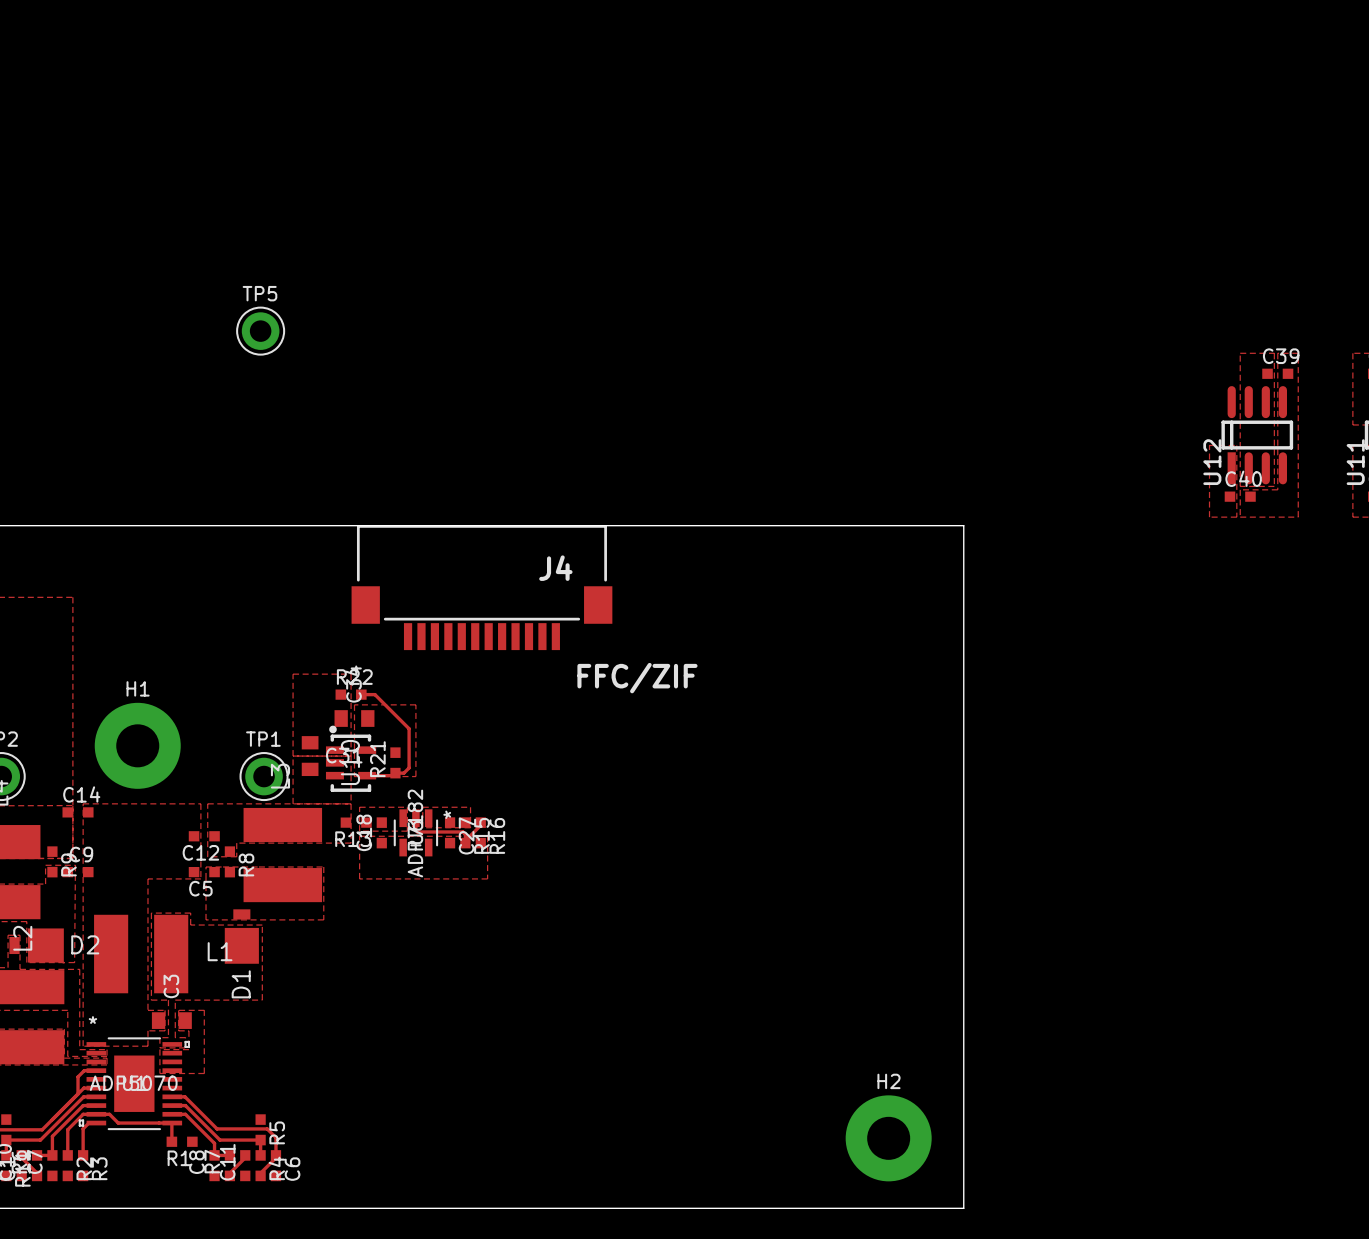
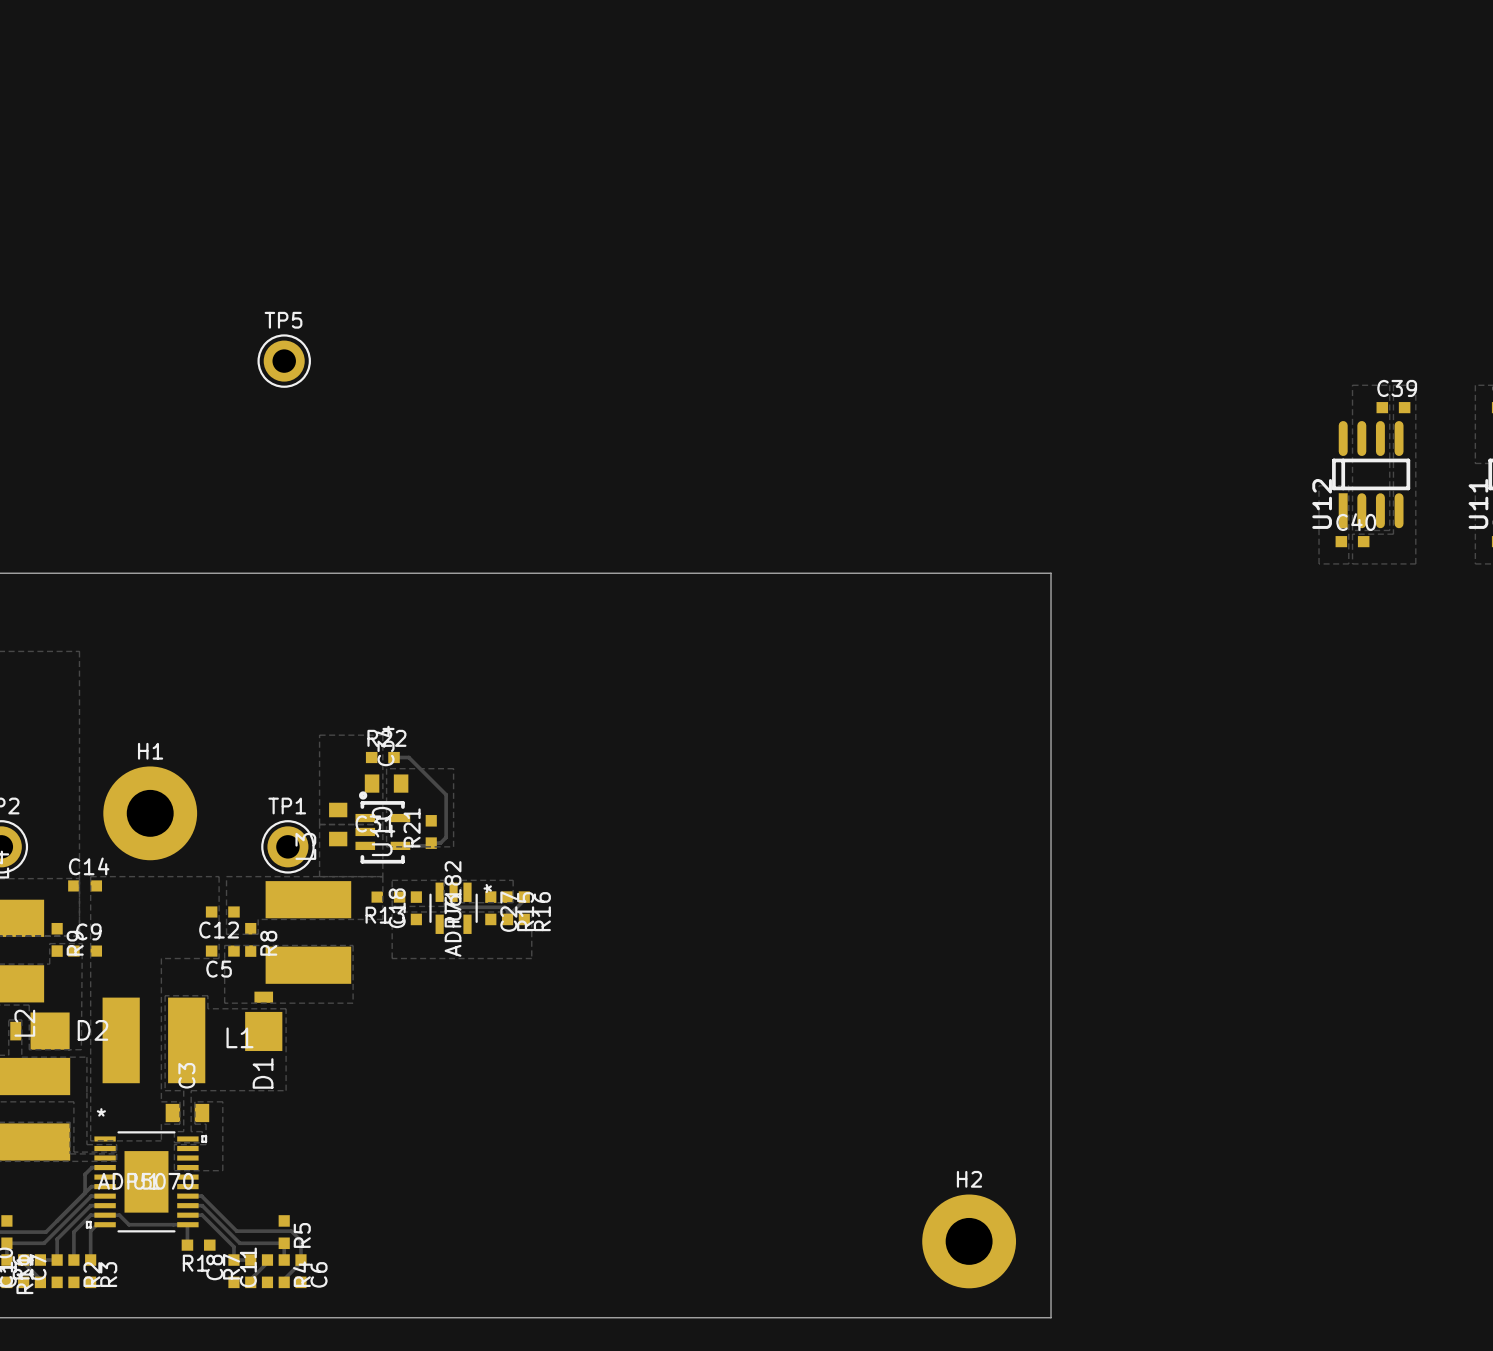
J4: FFC/ZIF (481, 587) -> none

